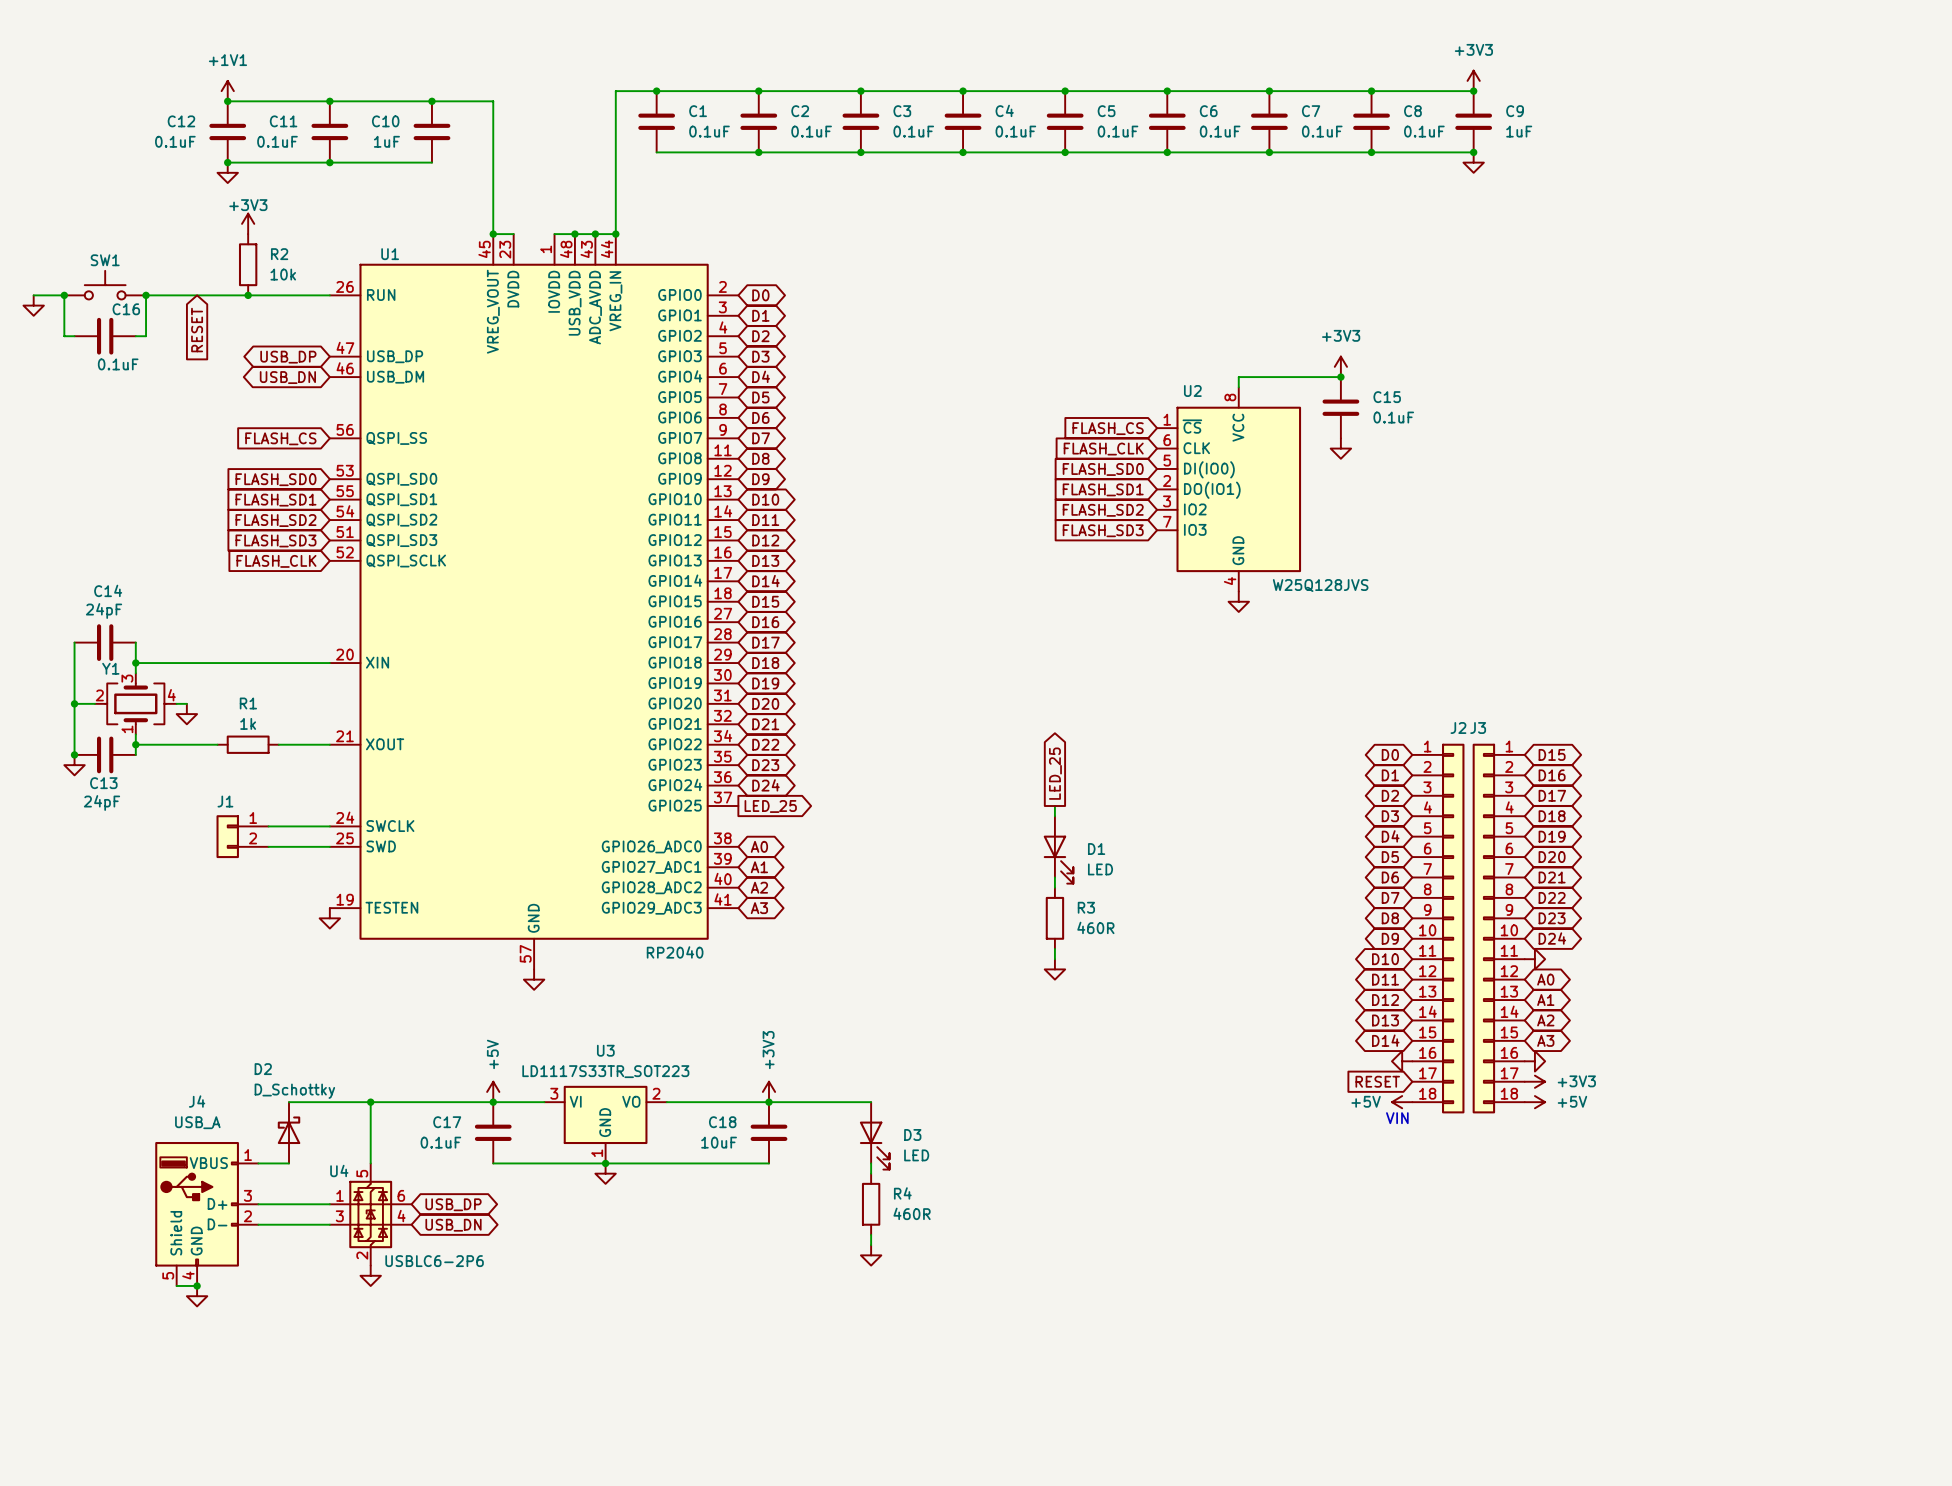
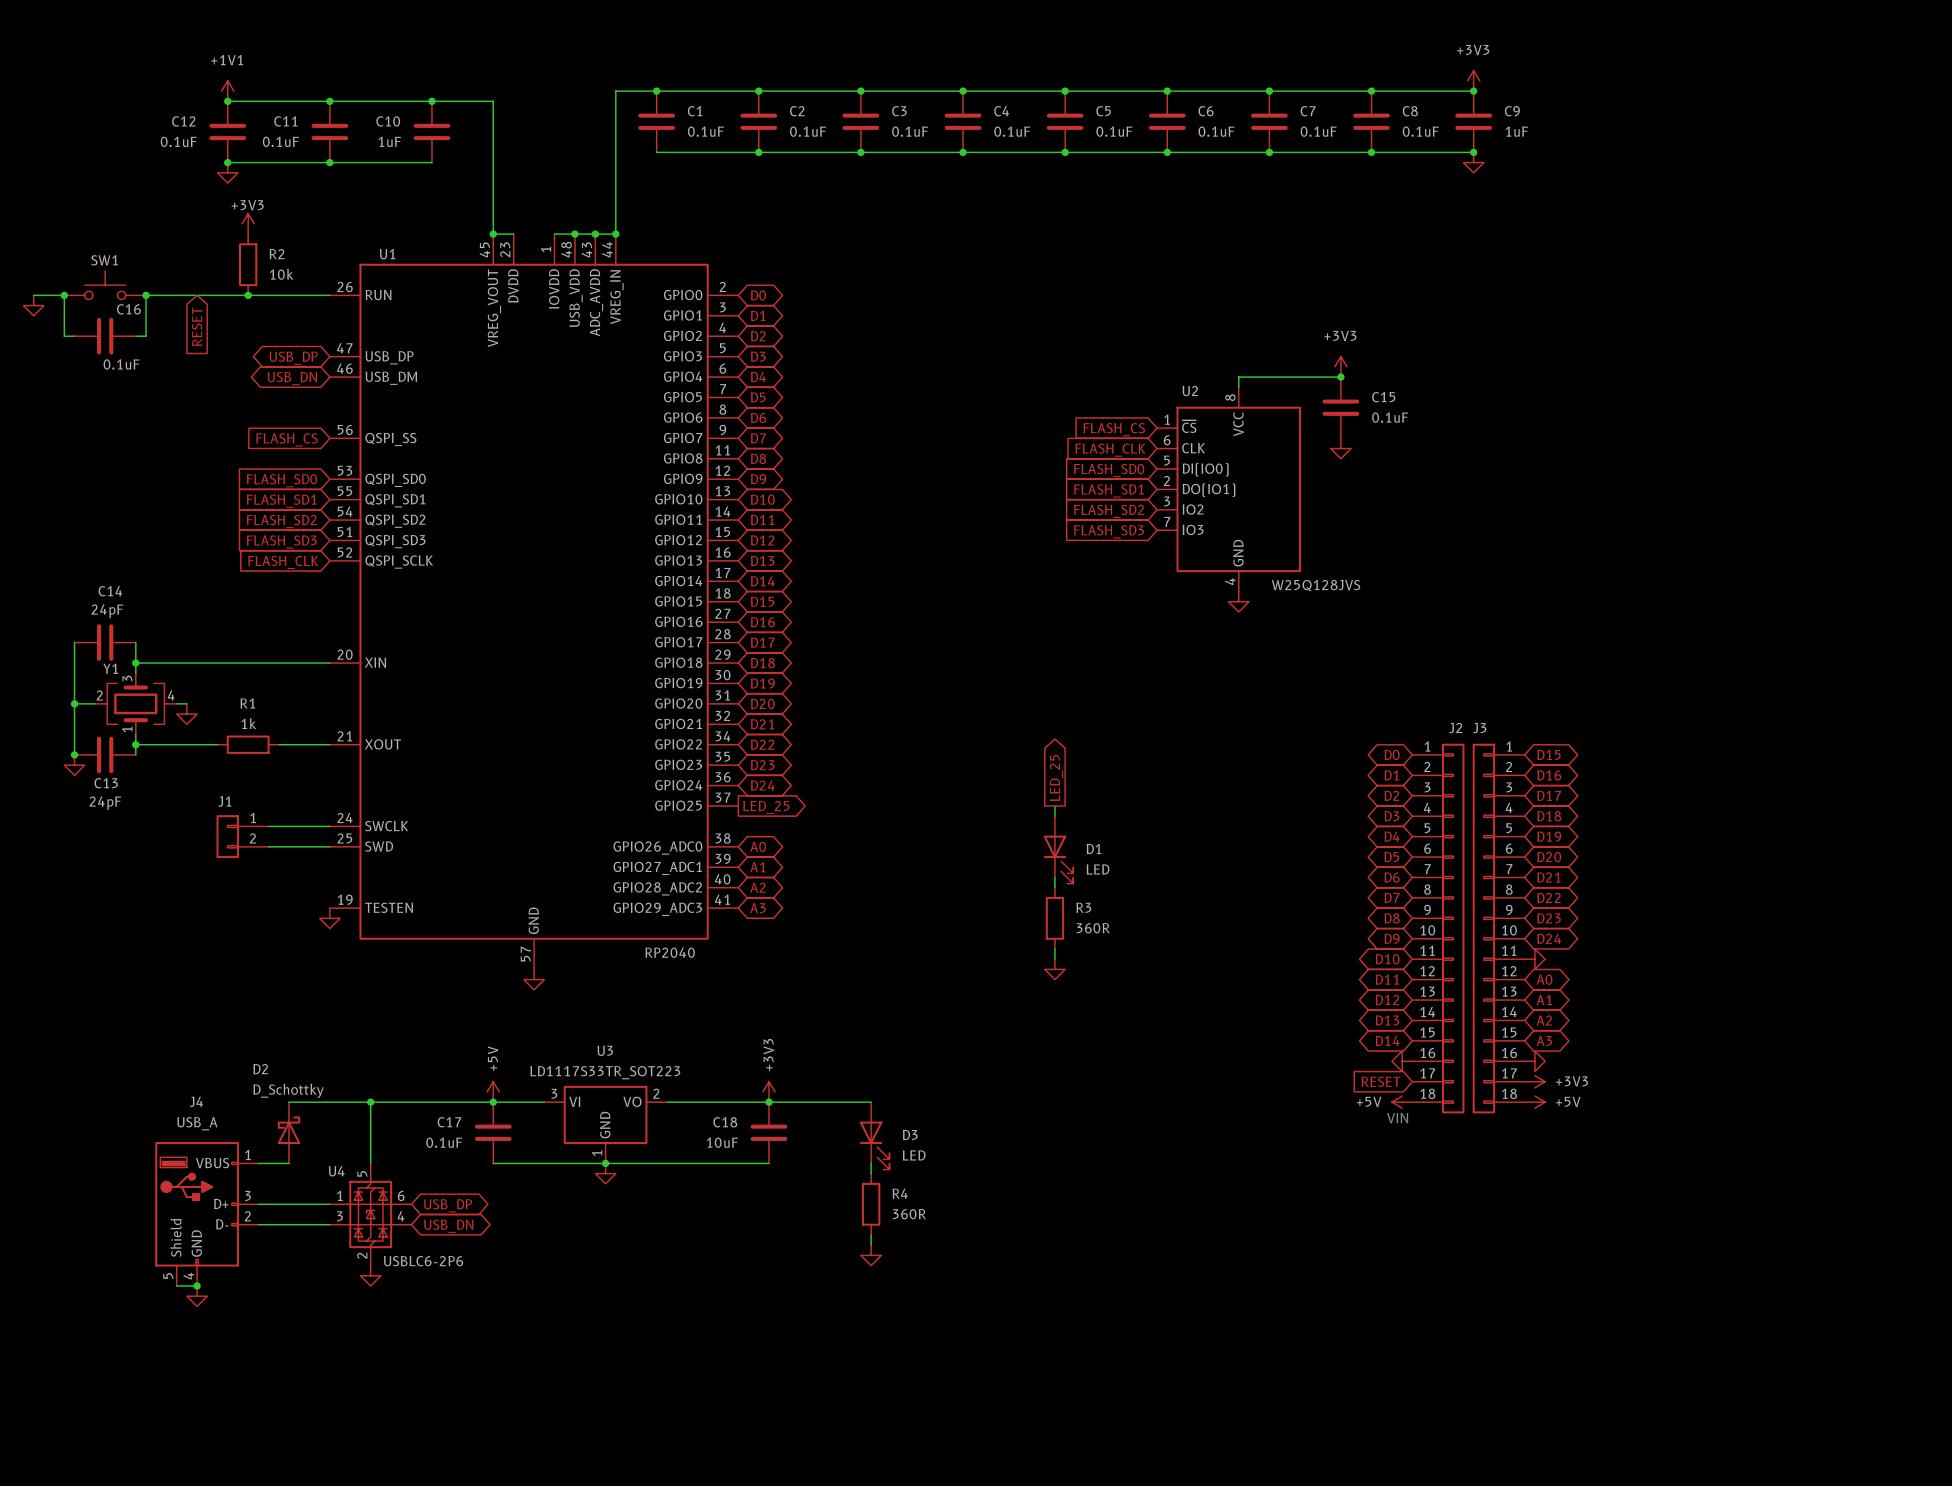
R3 value: 460R (1095, 927) -> 360R (1093, 928)
R4 value: 460R (912, 1213) -> 360R (909, 1214)

